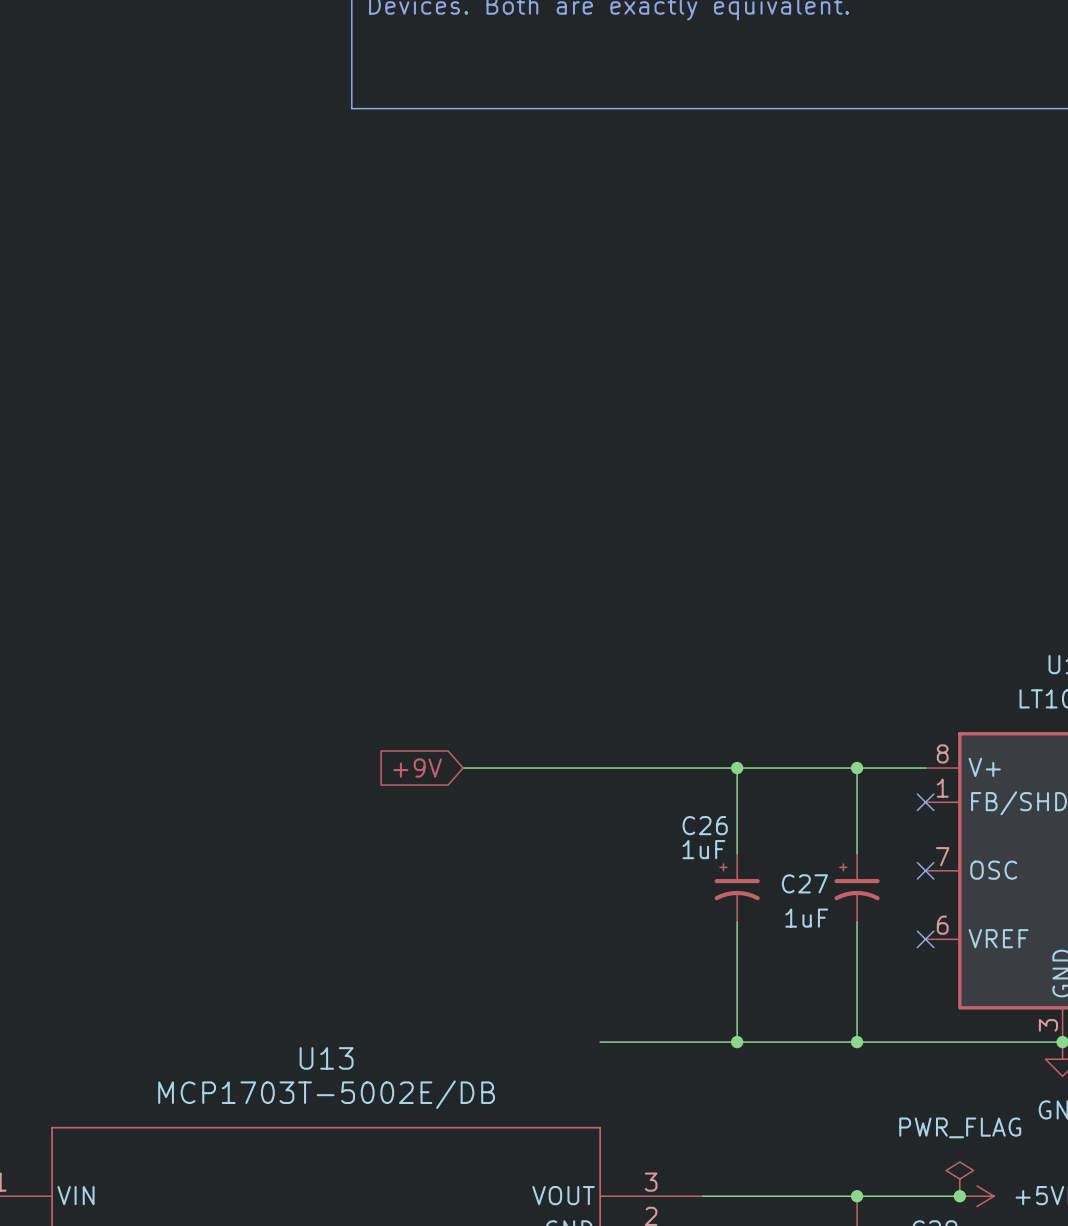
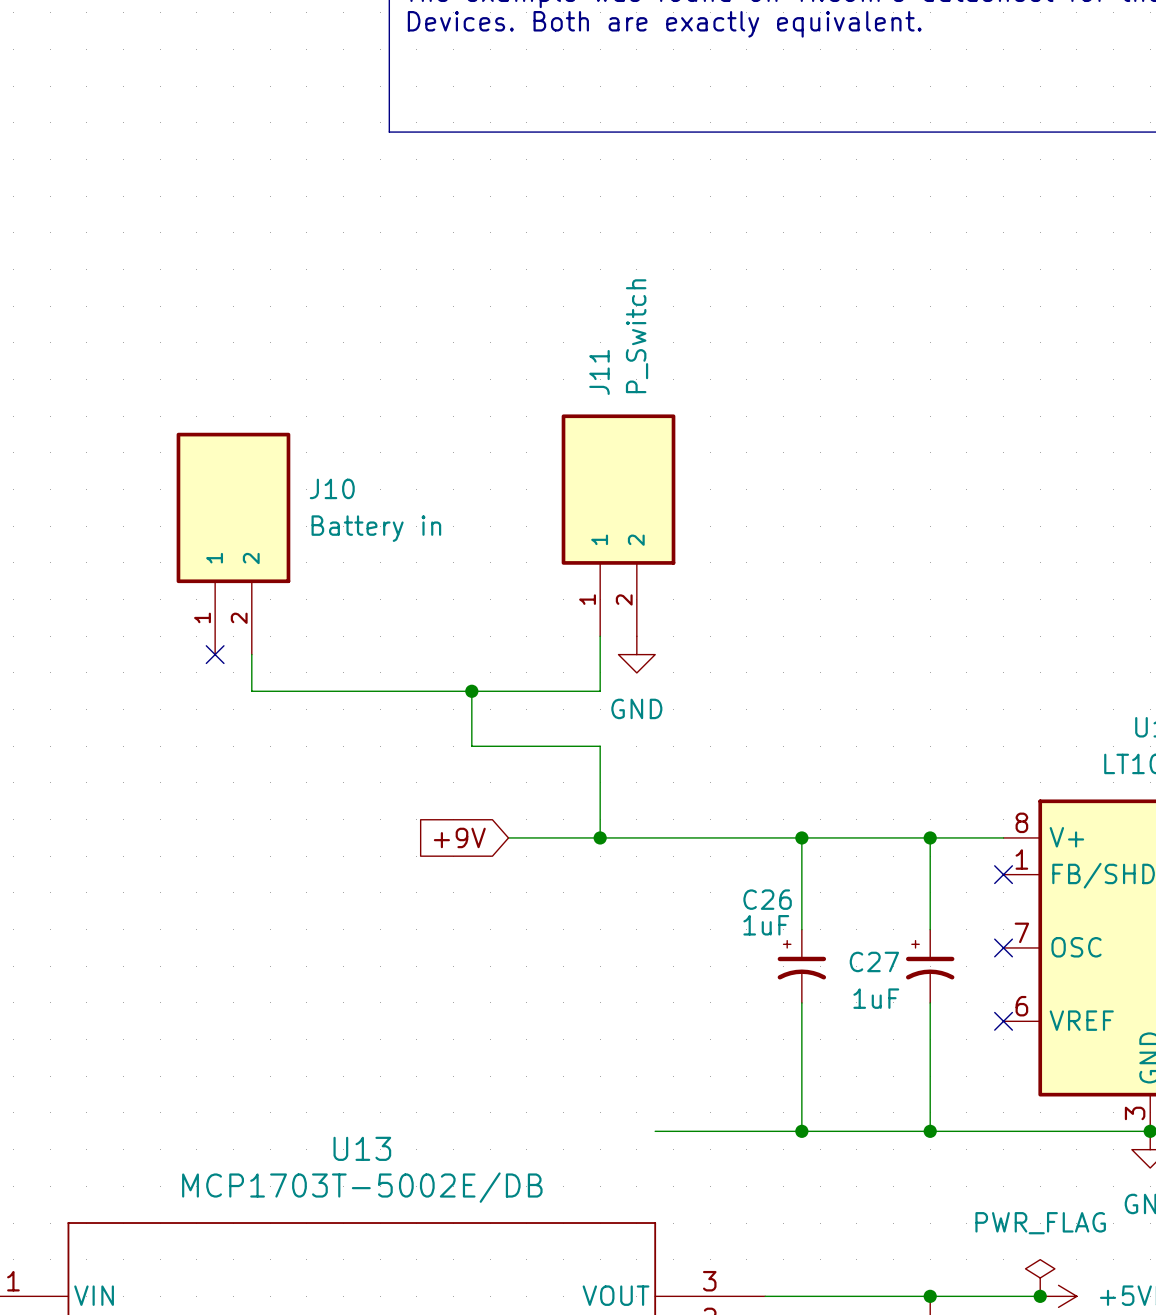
J11: none -> P_Switch (618, 525)
J10: none -> Battery in (233, 543)
wire: none -> (600, 636) (600, 691) (251, 691) (251, 654)
no-connect mark: none -> (215, 654)
power symbol: none -> GND (636, 654)
wire: none -> (471, 691) (471, 746) (600, 746) (600, 837)
junction: none -> (471, 691)
junction: none -> (600, 837)

